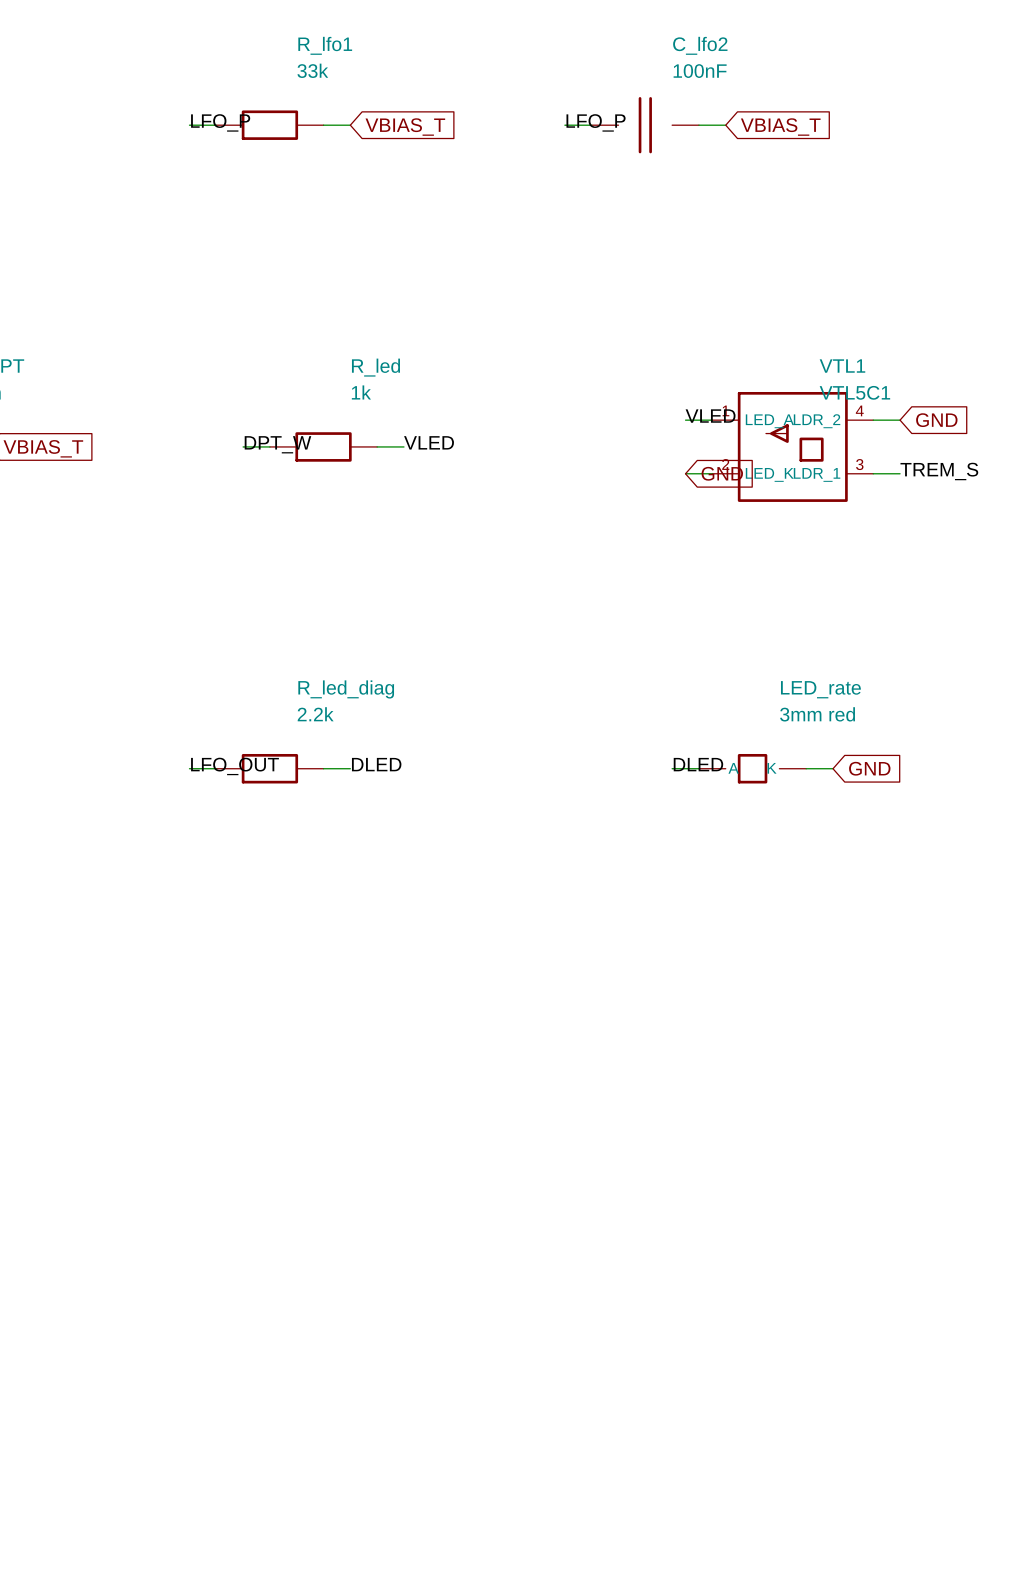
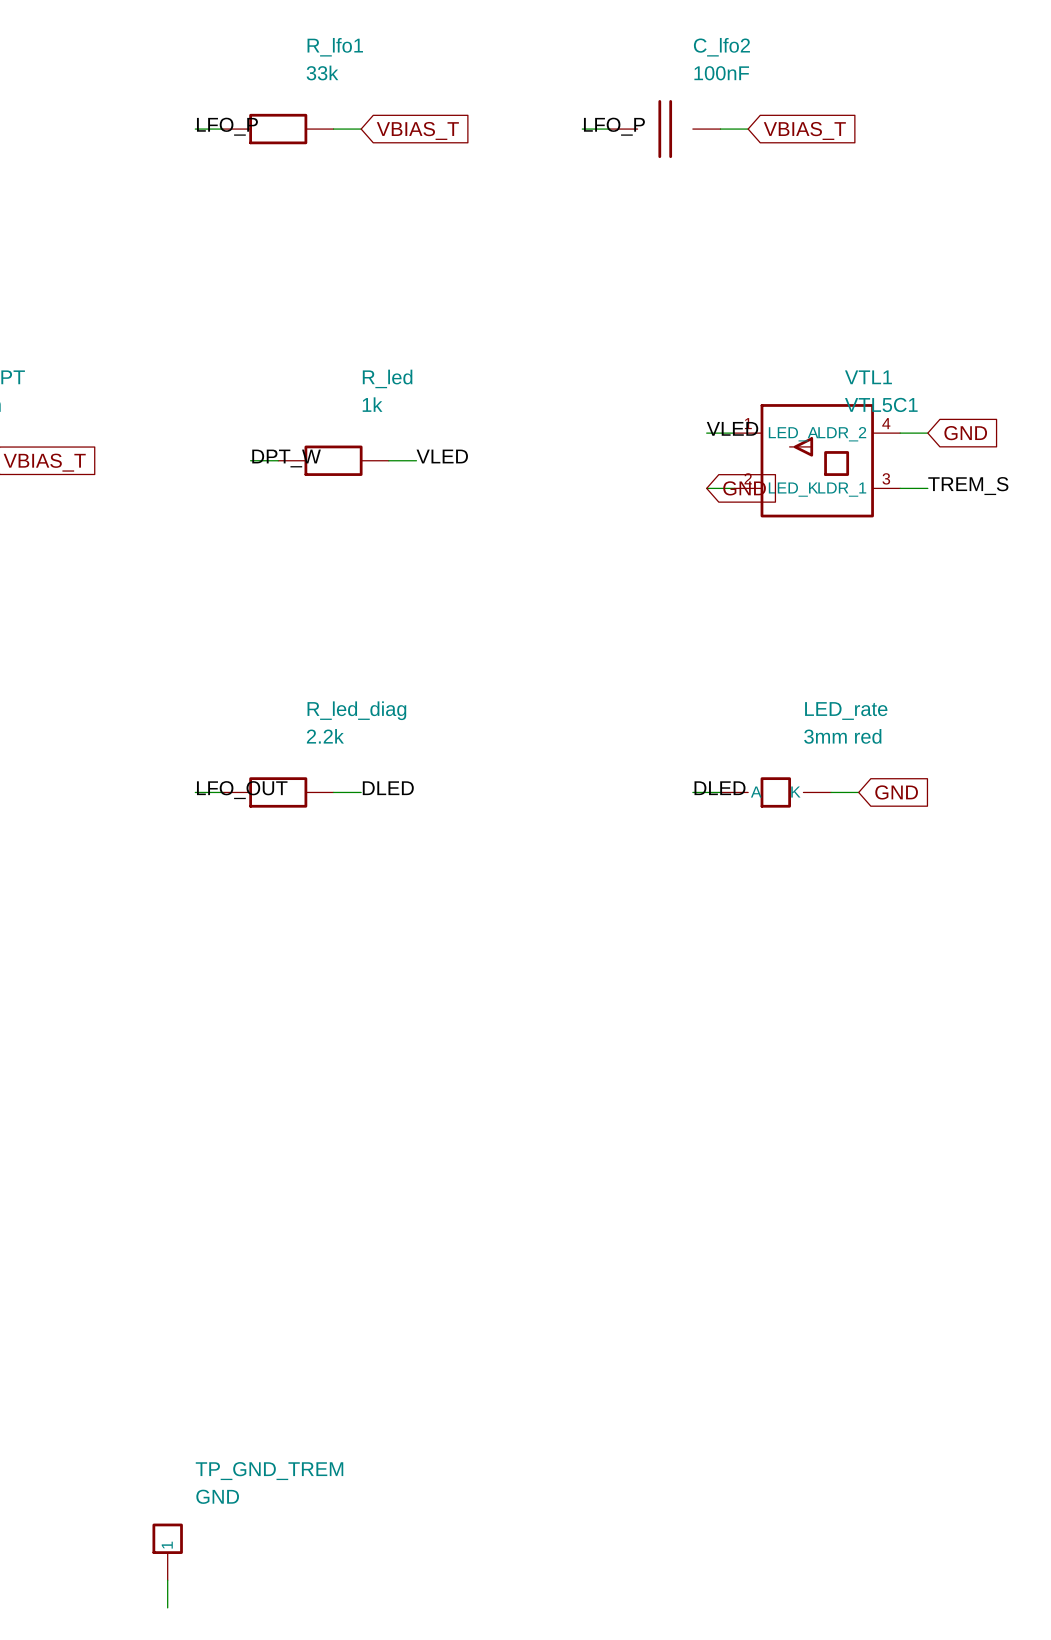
TP_GND_TREM: none -> GND (167, 1551)
wire: none -> (167, 1580) (167, 1607)

